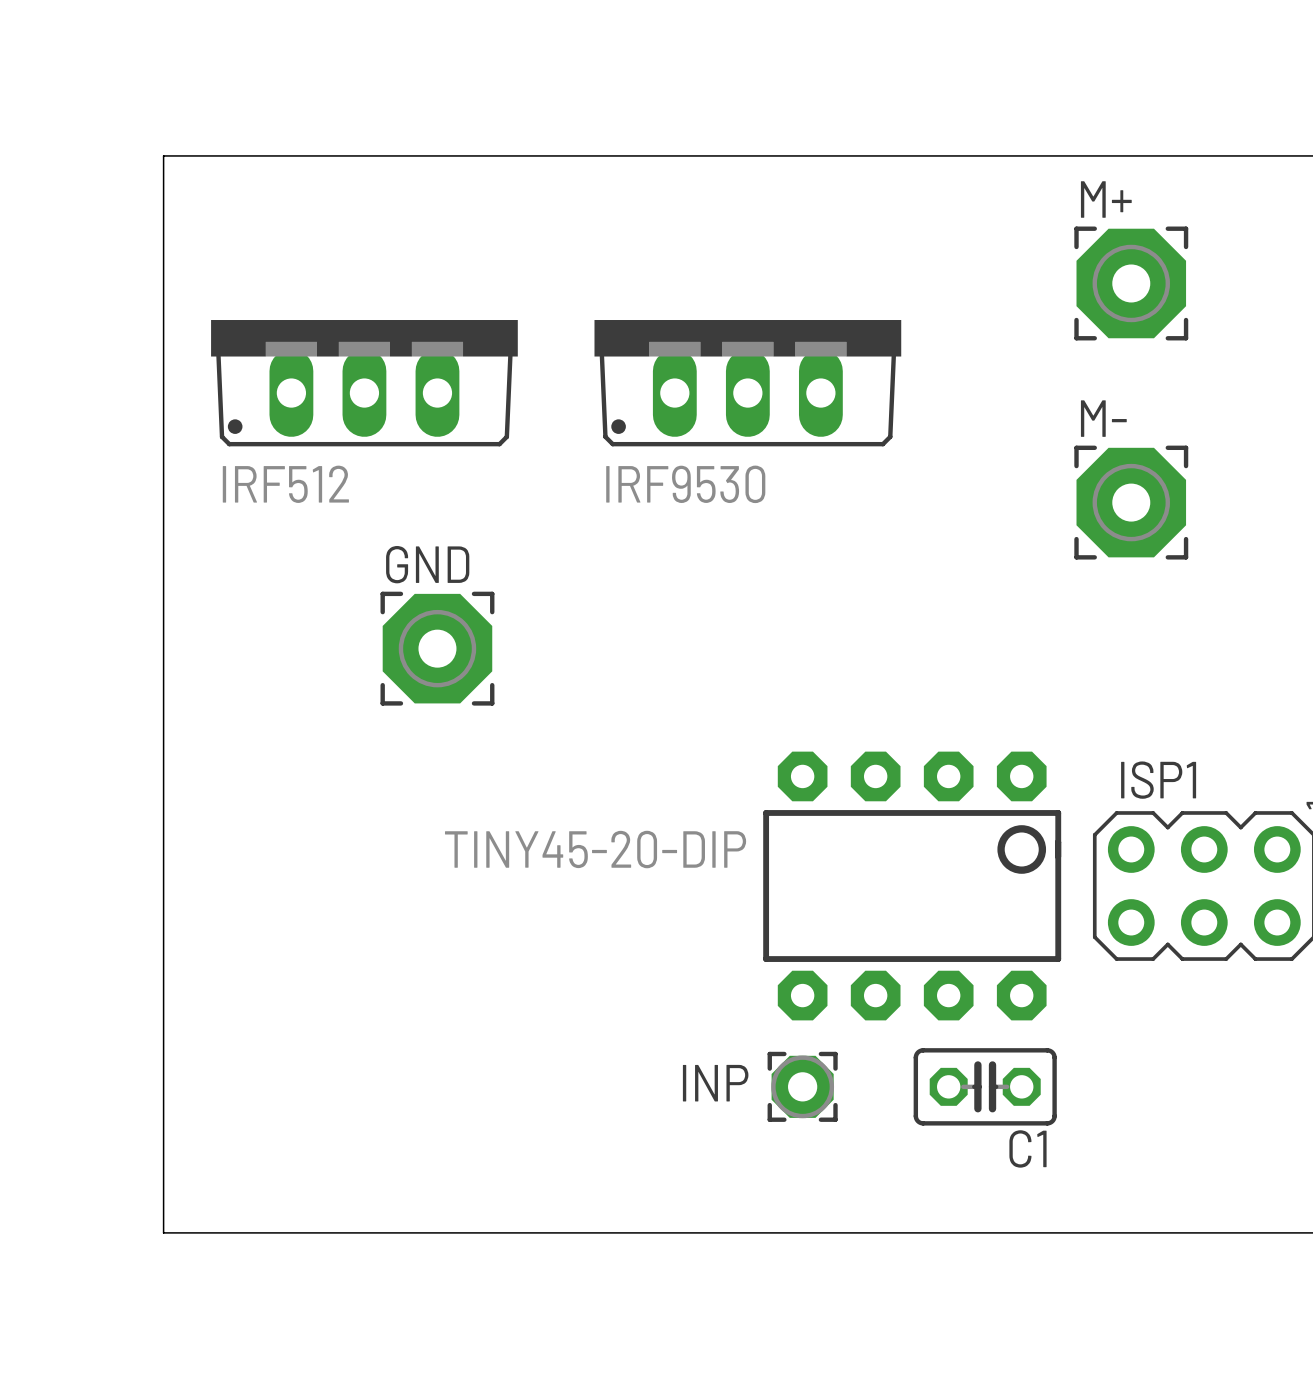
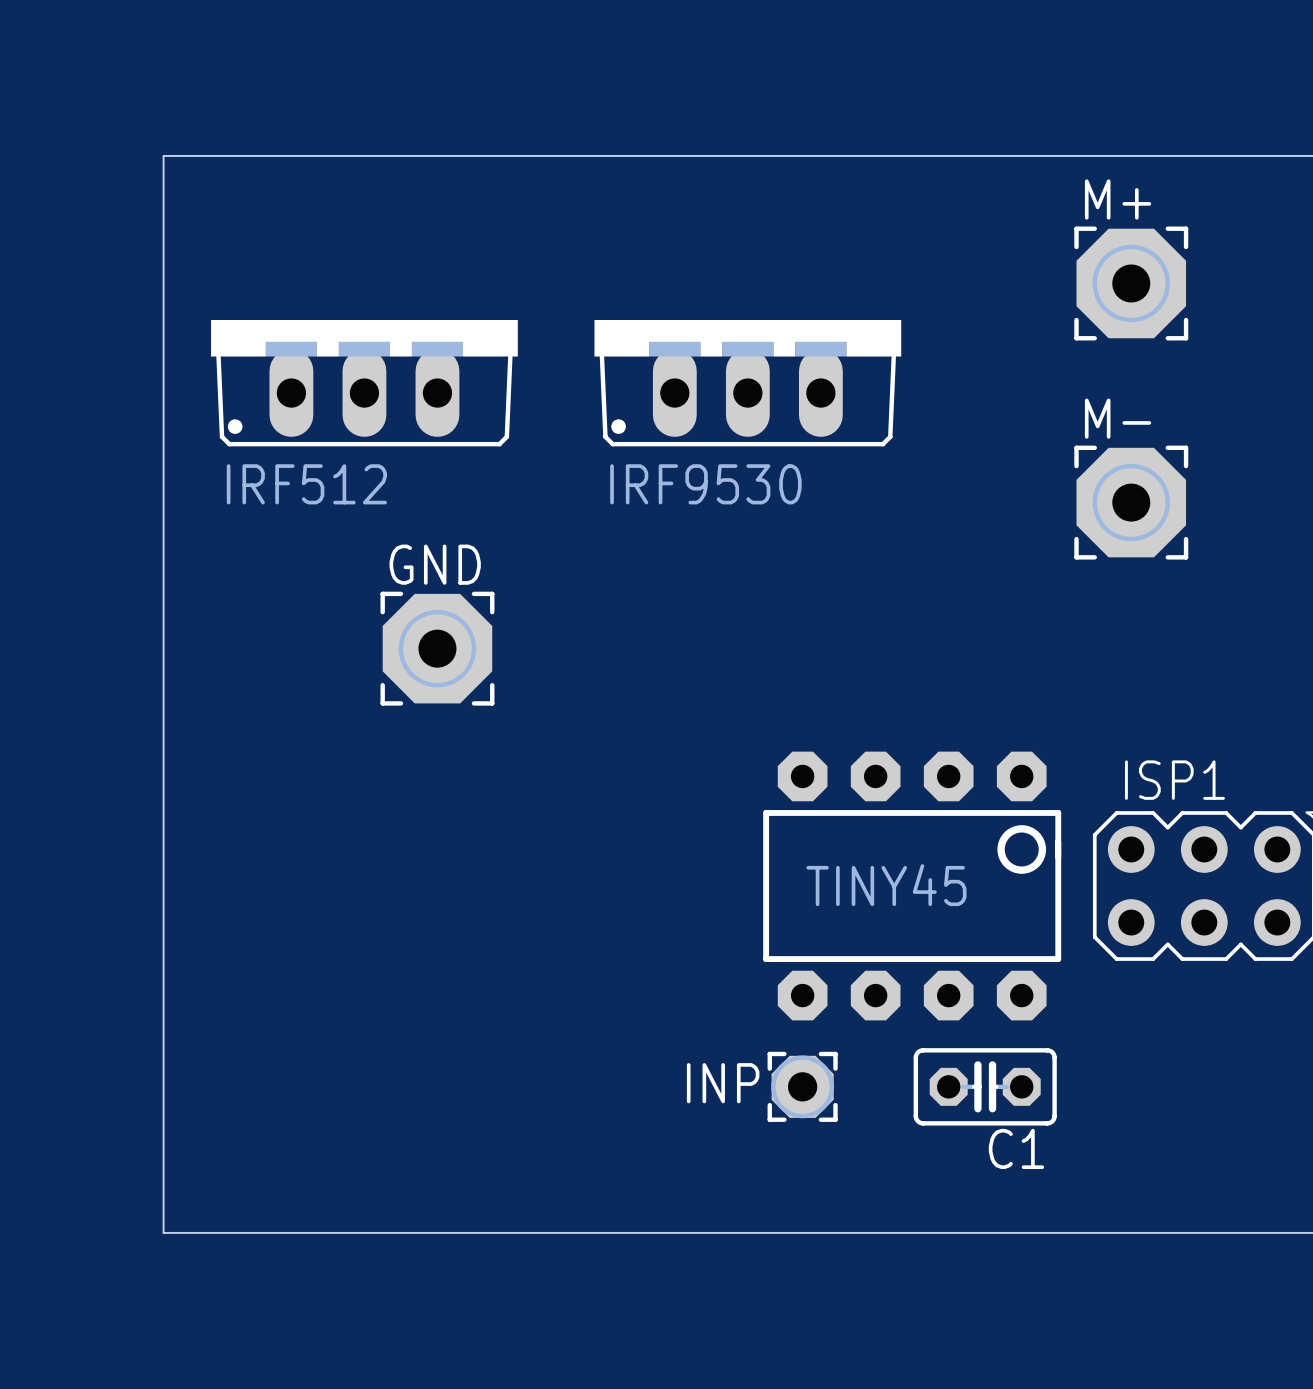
part value: TINY45-20-DIP (595, 849) -> TINY45 (886, 885)

